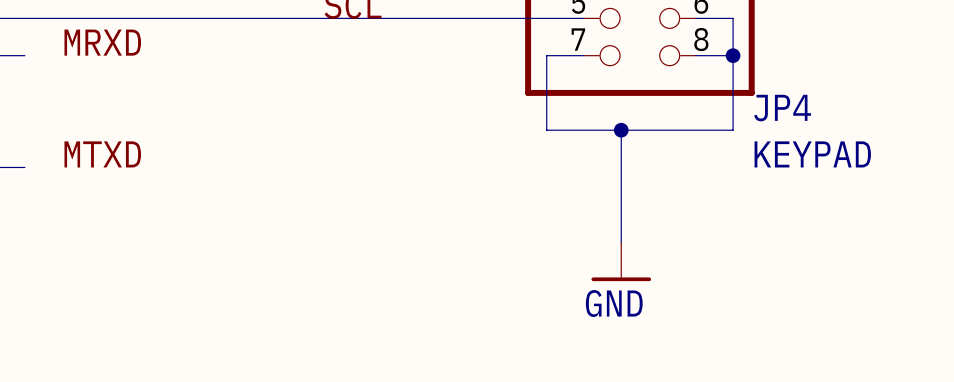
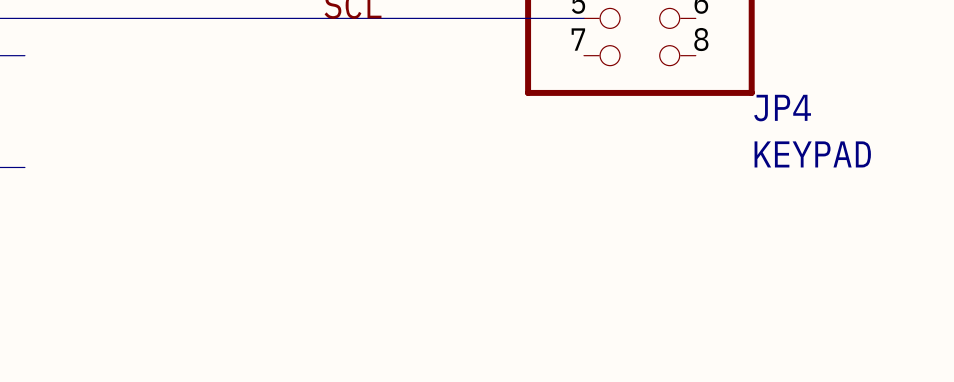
wire: (695, 18) (733, 18) (733, 130) (546, 130) (546, 55) (583, 55) -> none
label: MRXD (102, 42) -> none
wire: (695, 55) (733, 55) -> none
junction: (733, 55) -> none
wire: (621, 130) (621, 242) -> none
junction: (621, 130) -> none
label: MTXD (102, 154) -> none
power symbol: GND (621, 261) -> none

